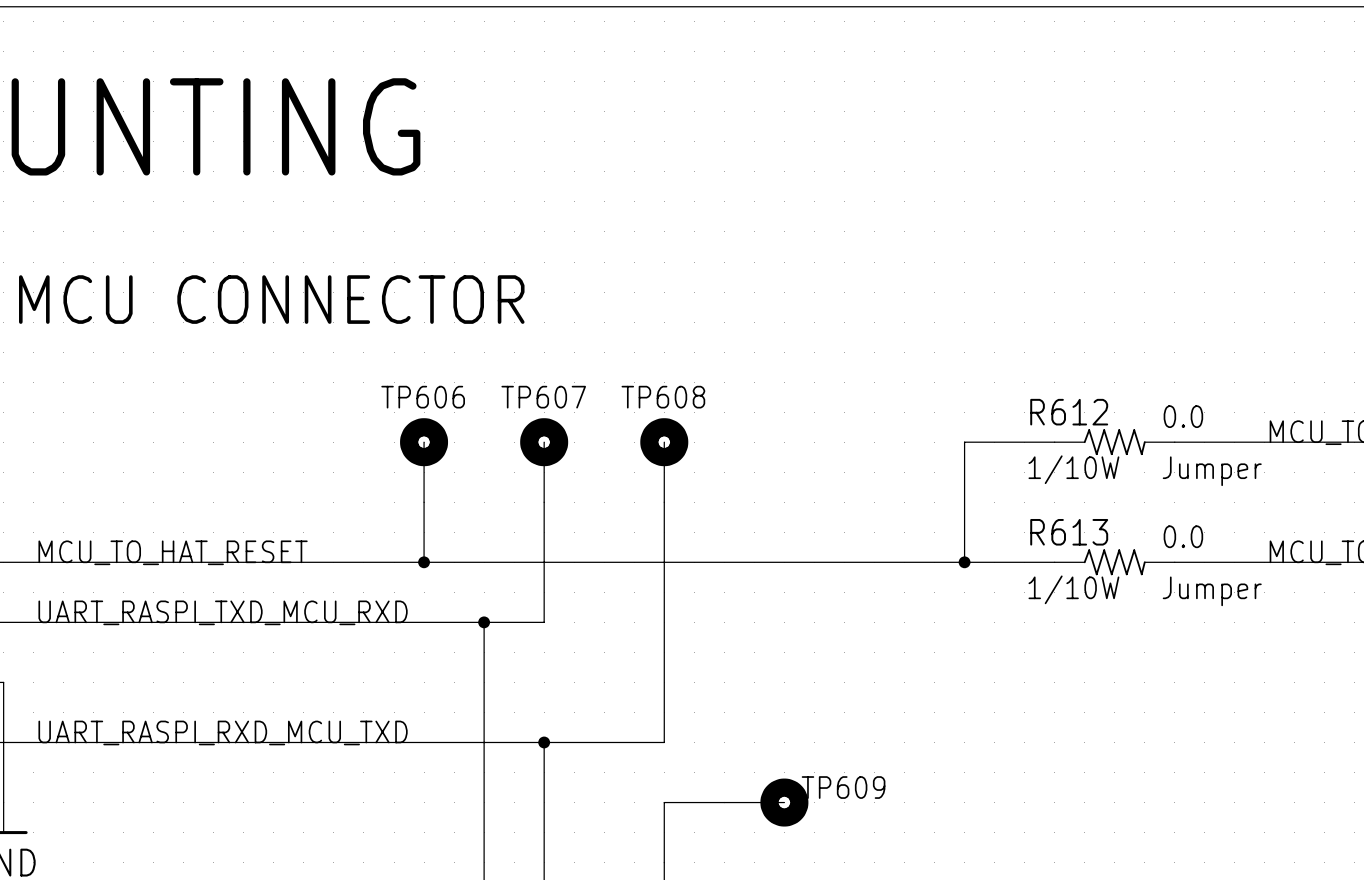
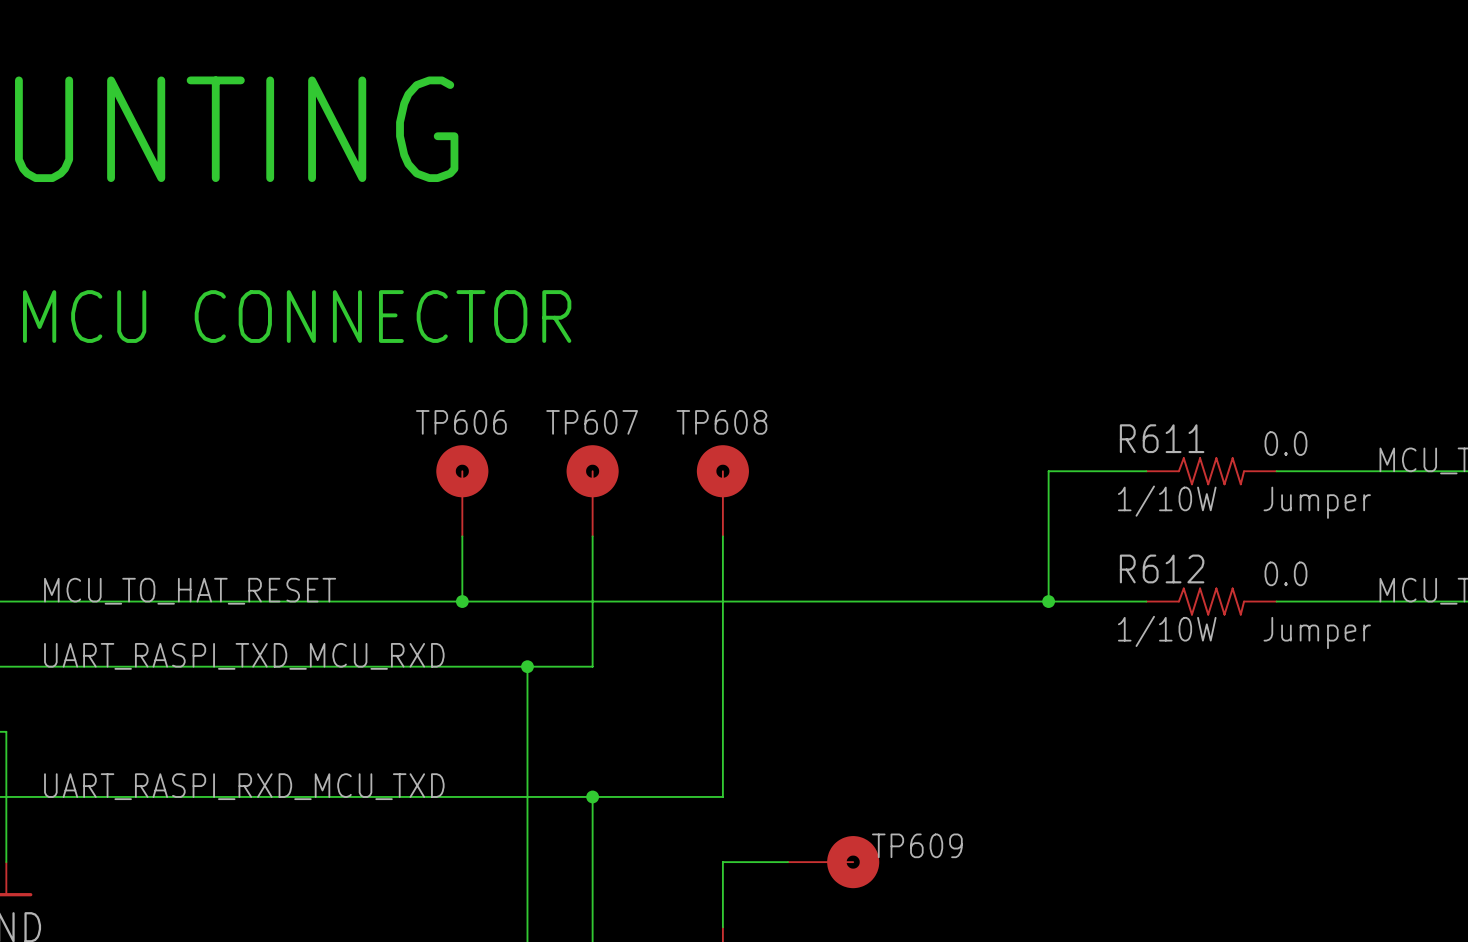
R612 name: R612 (1069, 412) -> R611 (1162, 438)
R613 name: R613 (1069, 532) -> R612 (1162, 568)

